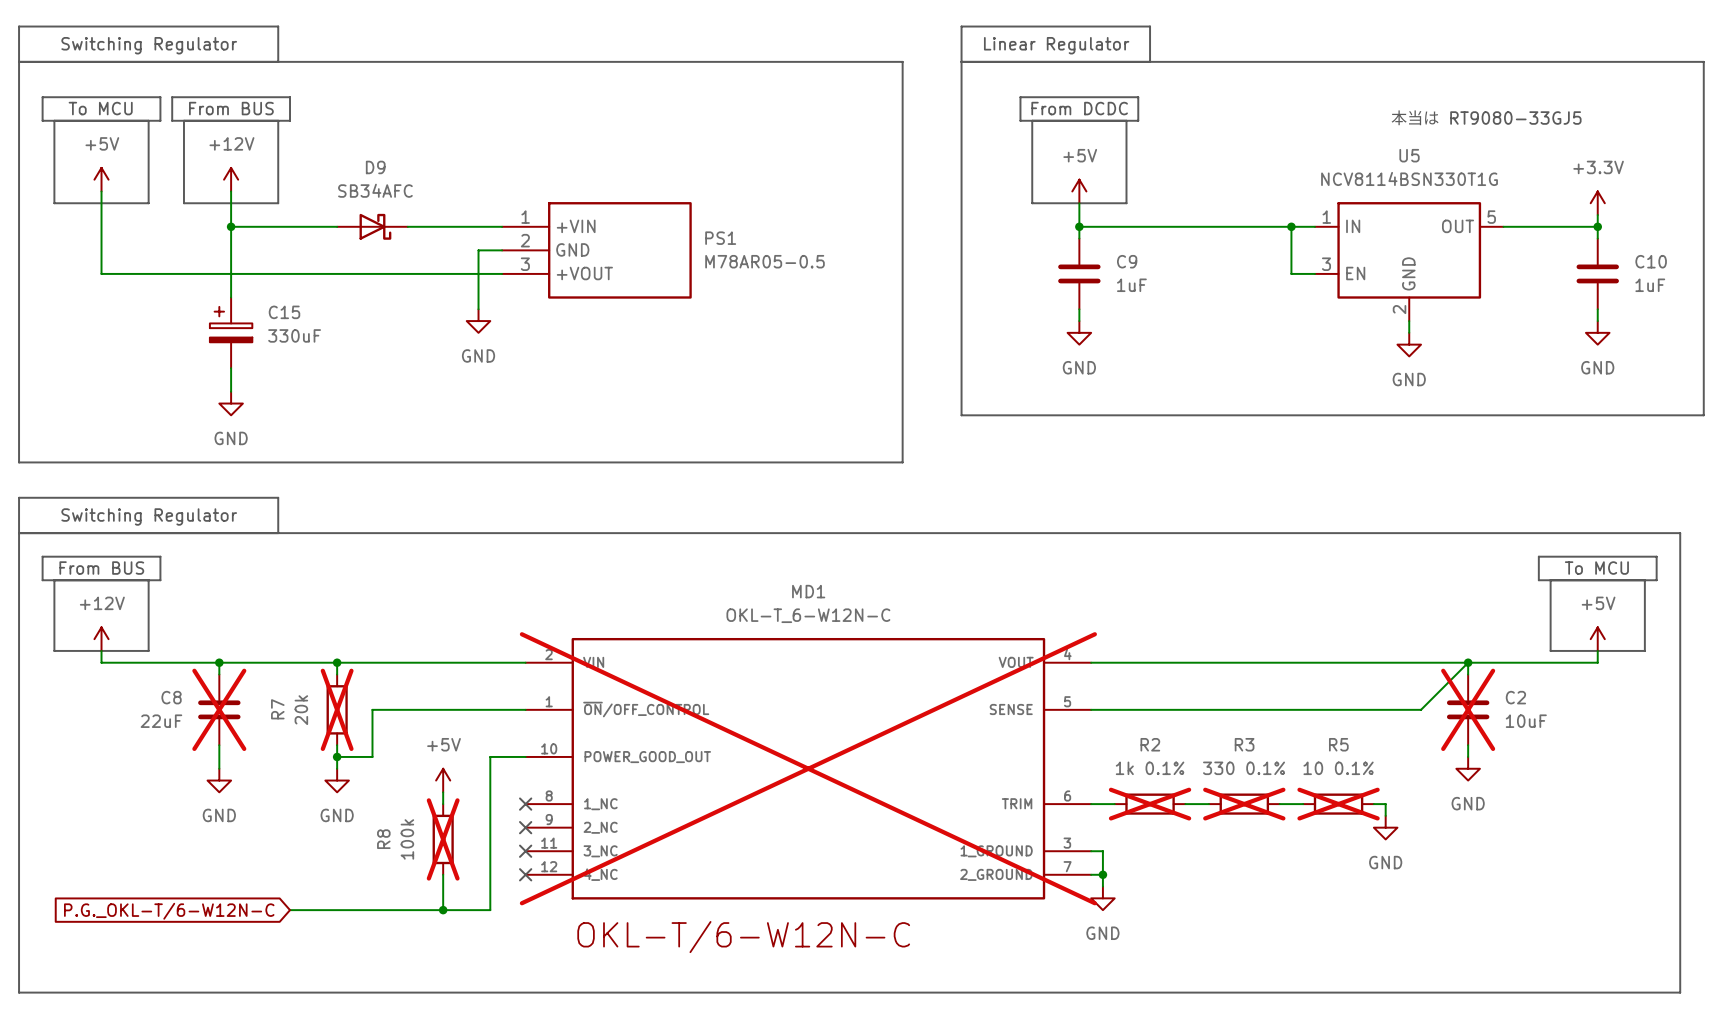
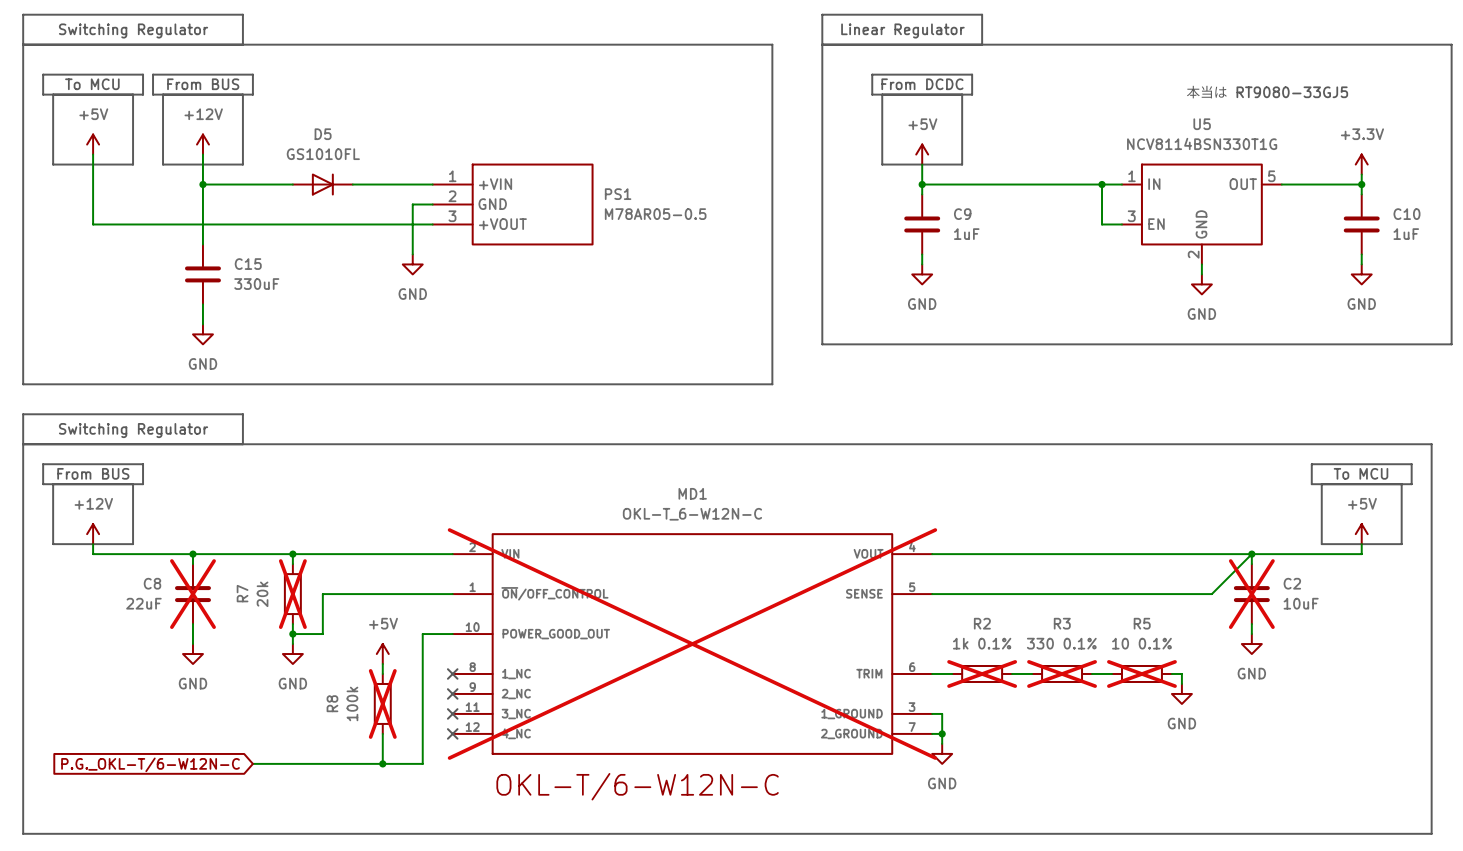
D9: SB34AFC (372, 226) -> none
D5: none -> GS1010FL (322, 184)
C15 symbol: [209, 297, 253, 369] -> [185, 244, 221, 305]

